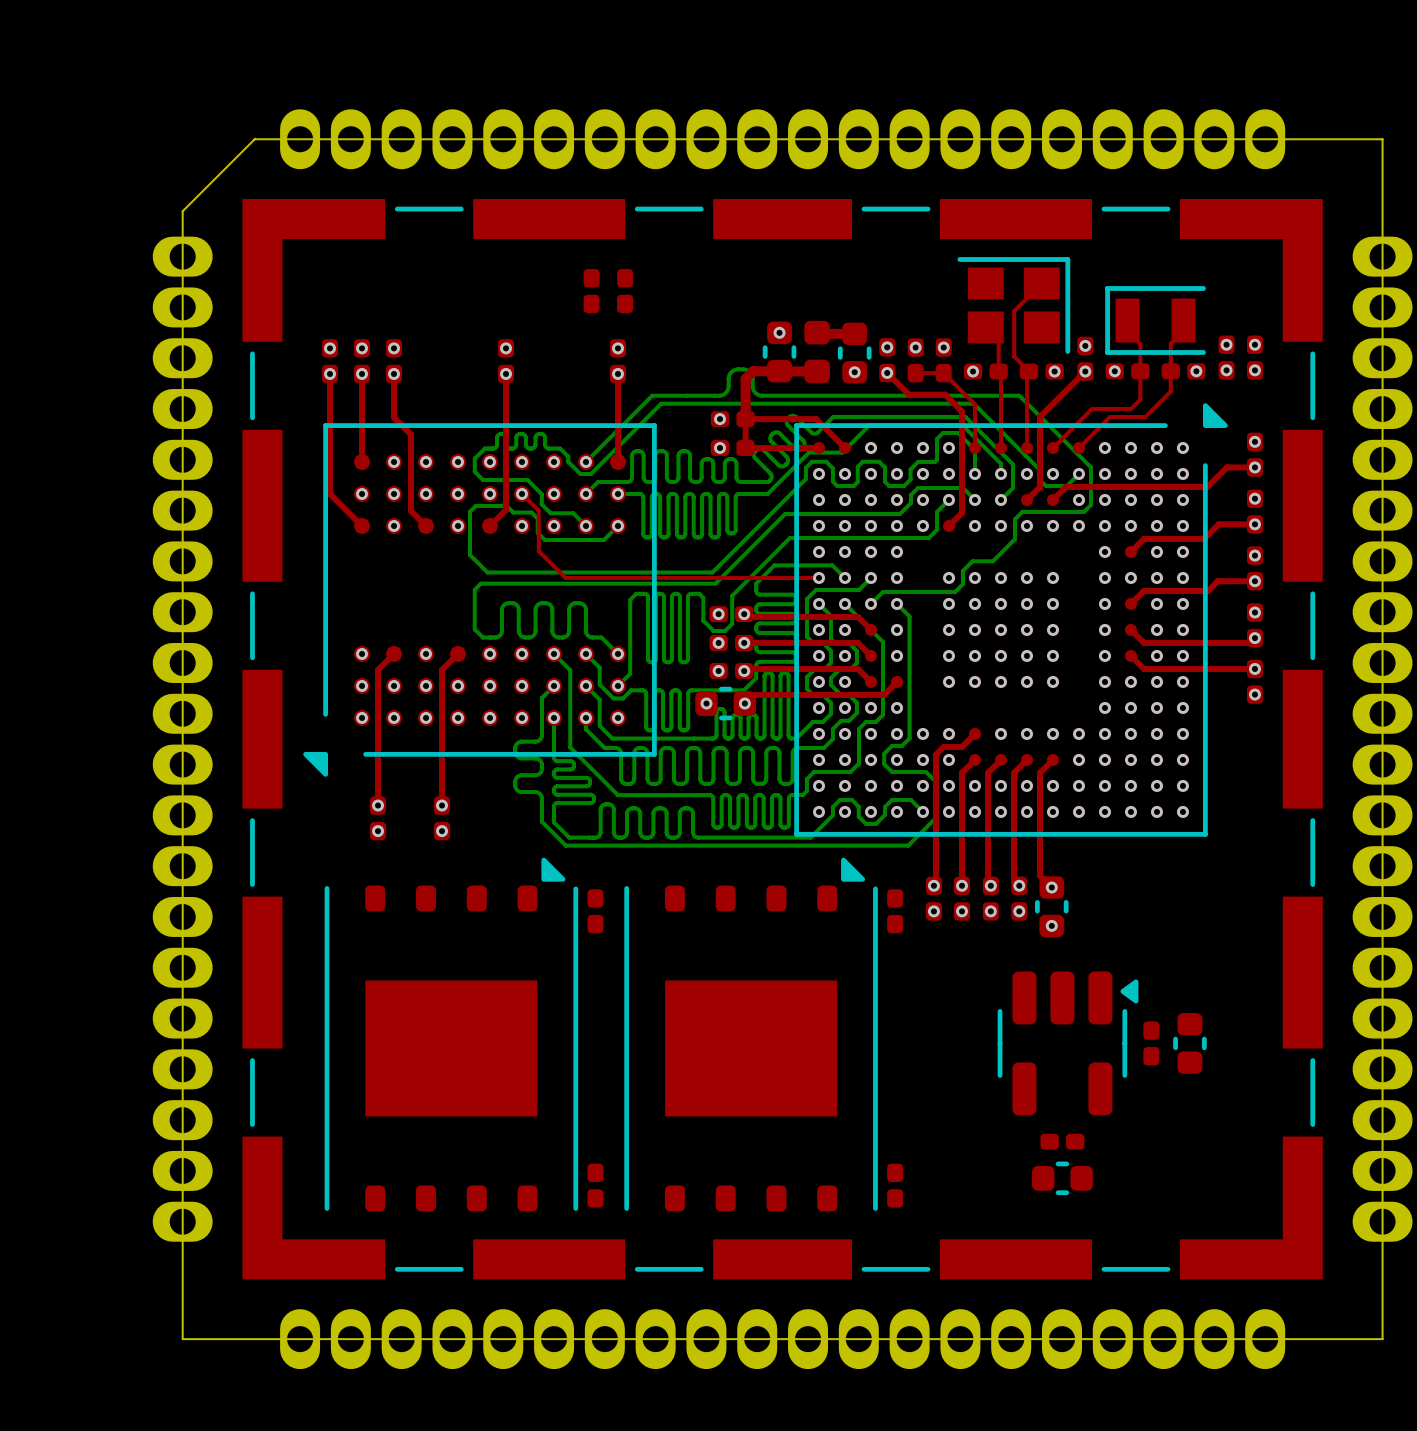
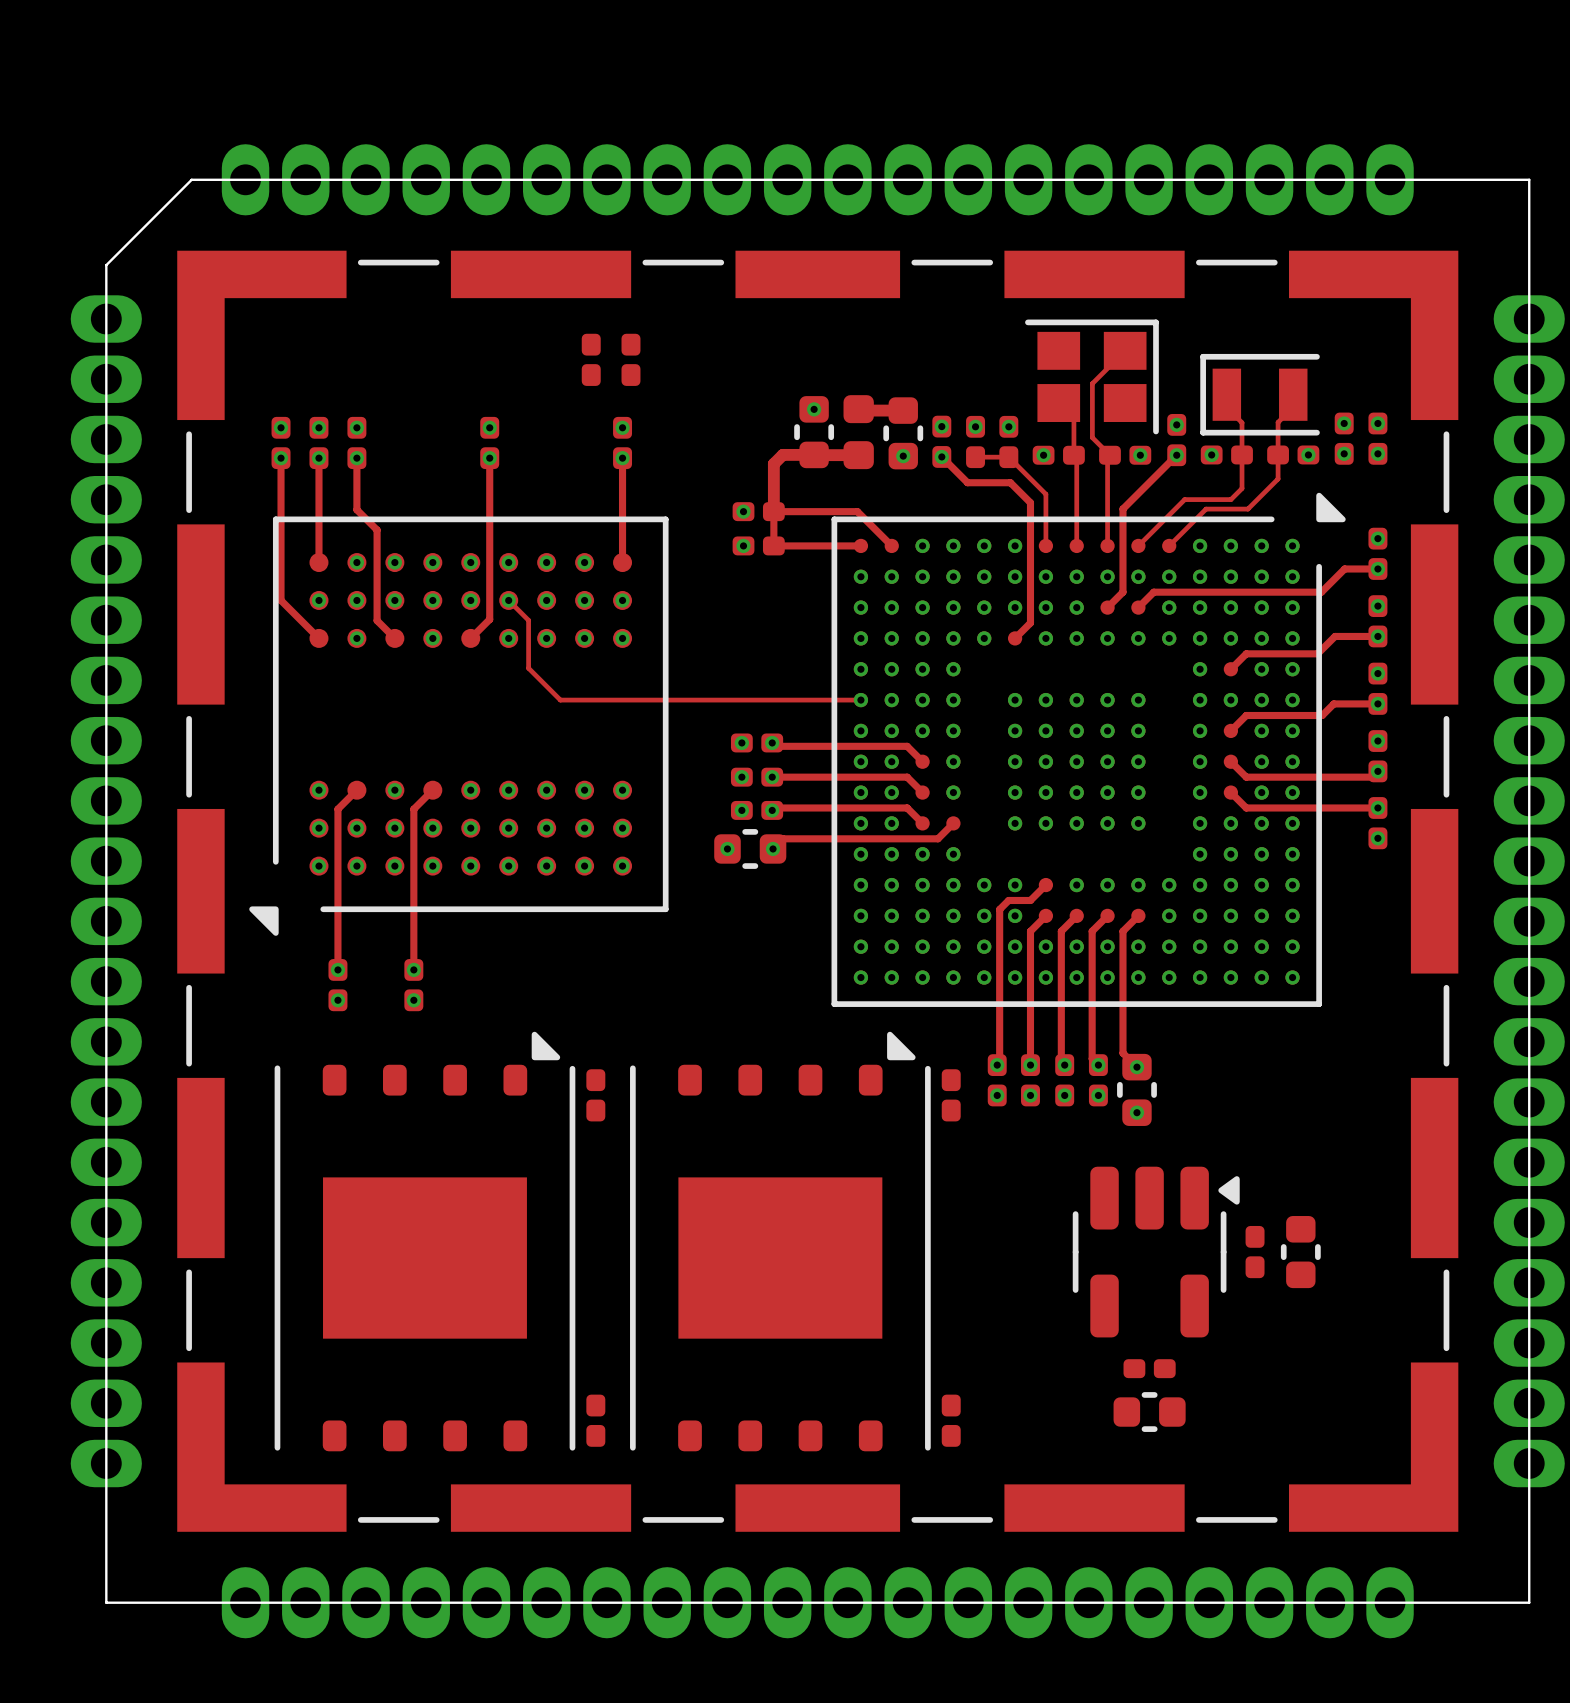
bottom track: (585, 461) (652, 395) (722, 395) (728, 389) (730, 372) (735, 369) (743, 369) (751, 373) (753, 390) (761, 395) (1019, 395) (1090, 467) (1090, 504) (1083, 511) (1022, 511) (1014, 519) (1014, 539) (992, 561) (972, 561) (963, 570) (963, 584) (955, 591) (883, 591) (871, 603) -> none
bottom track: (975, 473) (975, 449) (957, 432) (943, 432) (937, 439) (937, 459) (934, 461) (918, 461) (910, 469) (910, 479) (904, 485) (889, 485) (885, 481) (885, 467) (879, 461) (862, 461) (857, 466) (857, 482) (853, 485) (837, 485) (833, 481) (833, 468) (826, 461) (812, 461) (805, 467) (805, 479) (712, 572) (487, 572) (470, 554) (470, 511) (475, 505) (506, 505) (513, 512) (531, 512) (537, 518) (537, 532) (544, 539) (604, 539) (617, 525) -> none
bottom track: (1000, 473) (1000, 463) (962, 424) (869, 424) (842, 452) (808, 452) (767, 493) (736, 494) (735, 530) (733, 533) (727, 530) (727, 496) (725, 494) (718, 496) (718, 534) (715, 537) (710, 534) (708, 494) (704, 494) (702, 496) (702, 534) (698, 537) (693, 534) (693, 495) (688, 494) (685, 496) (685, 534) (680, 537) (676, 534) (676, 496) (674, 494) (669, 494) (668, 534) (663, 537) (660, 534) (660, 496) (657, 494) (653, 494) (651, 497) (651, 534) (646, 537) (643, 534) (642, 495) (617, 493) -> none
bottom track: (1078, 473) (1066, 485) (1045, 485) (1038, 479) (1038, 469) (973, 403) (661, 403) (590, 473) (580, 473) (568, 461) (568, 456) (560, 448) (546, 447) (544, 436) (541, 434) (536, 435) (535, 446) (531, 448) (526, 446) (525, 436) (523, 434) (517, 435) (515, 446) (510, 448) (506, 446) (505, 435) (499, 434) (497, 436) (495, 447) (484, 448) (474, 458) (474, 471) (483, 480) (527, 480) (541, 494) (541, 504) (550, 513) (573, 513) (585, 525) -> none
bottom track: (585, 493) (597, 481) (630, 481) (632, 477) (632, 455) (636, 451) (643, 454) (643, 477) (647, 481) (652, 481) (654, 479) (655, 455) (659, 451) (664, 451) (666, 454) (667, 479) (670, 481) (676, 481) (678, 477) (678, 454) (680, 451) (685, 451) (689, 454) (690, 477) (692, 481) (701, 479) (701, 462) (706, 459) (712, 462) (714, 480) (722, 481) (724, 477) (725, 462) (731, 459) (736, 462) (736, 477) (738, 481) (768, 481) (771, 474) (754, 457) (754, 453) (757, 449) (761, 448) (779, 465) (785, 465) (787, 461) (787, 457) (771, 441) (770, 437) (773, 433) (777, 432) (795, 449) (799, 449) (803, 447) (803, 441) (786, 423) (787, 419) (791, 415) (795, 416) (814, 433) (833, 416) (965, 416) (1012, 464) (1012, 487) (1000, 499) -> none
bottom track: (949, 499) (937, 511) (937, 529) (928, 537) (790, 537) (732, 595) (732, 623) (725, 630) (713, 630) (703, 620) (703, 597) (699, 593) (689, 594) (687, 659) (685, 662) (681, 661) (679, 659) (679, 595) (674, 593) (671, 596) (671, 659) (668, 662) (663, 659) (663, 596) (661, 593) (656, 595) (655, 659) (651, 662) (647, 659) (647, 596) (645, 593) (636, 593) (630, 599) (630, 673) (617, 685) -> none
bottom track: (975, 499) (963, 487) (918, 487) (911, 495) (911, 502) (900, 513) (785, 513) (715, 583) (480, 583) (474, 589) (474, 629) (482, 637) (495, 637) (500, 634) (502, 608) (508, 603) (514, 603) (518, 607) (518, 631) (521, 636) (529, 637) (534, 634) (535, 607) (539, 603) (545, 603) (552, 608) (553, 634) (557, 637) (564, 637) (568, 632) (569, 606) (573, 603) (579, 603) (585, 608) (587, 634) (591, 637) (601, 637) (617, 653) -> none
bottom track: (845, 577) (832, 565) (774, 565) (756, 583) (756, 592) (760, 594) (792, 594) (795, 596) (795, 601) (792, 604) (759, 604) (756, 606) (756, 611) (759, 613) (792, 613) (795, 616) (795, 620) (792, 623) (759, 623) (756, 625) (756, 630) (759, 632) (792, 633) (795, 635) (795, 639) (792, 642) (759, 642) (756, 644) (756, 649) (759, 652) (792, 652) (795, 655) (795, 659) (791, 661) (758, 662) (756, 665) (756, 678) (743, 690) (689, 690) (688, 727) (685, 730) (679, 727) (678, 691) (673, 690) (671, 692) (671, 727) (668, 730) (663, 727) (662, 692) (660, 690) (655, 691) (654, 727) (648, 730) (646, 727) (645, 691) (631, 690) (623, 698) (613, 698) (599, 684) (599, 667) (585, 653) -> none
bottom track: (871, 577) (859, 589) (816, 589) (807, 599) (807, 636) (814, 643) (823, 643) (831, 651) (831, 662) (823, 669) (814, 669) (806, 677) (806, 688) (814, 695) (823, 695) (831, 702) (831, 714) (823, 721) (812, 721) (796, 738) (790, 738) (788, 735) (788, 676) (786, 672) (780, 675) (780, 735) (777, 738) (772, 735) (772, 676) (770, 672) (764, 675) (764, 735) (761, 738) (756, 736) (756, 717) (753, 714) (748, 717) (747, 737) (740, 736) (740, 717) (735, 714) (732, 717) (732, 736) (726, 738) (724, 711) (719, 708) (716, 711) (716, 735) (714, 738) (612, 738) (599, 725) (599, 699) (585, 685) -> none
bottom track: (819, 603) (831, 615) (831, 639) (835, 643) (849, 643) (857, 651) (857, 662) (849, 669) (839, 669) (831, 678) (831, 684) (842, 695) (849, 695) (857, 702) (857, 712) (849, 720) (841, 720) (832, 729) (832, 739) (824, 747) (794, 749) (792, 779) (789, 783) (783, 783) (779, 780) (779, 752) (774, 747) (768, 748) (766, 751) (766, 779) (764, 782) (757, 783) (753, 781) (752, 751) (750, 748) (745, 747) (739, 752) (739, 780) (735, 783) (729, 783) (726, 779) (726, 751) (724, 748) (718, 747) (713, 752) (713, 780) (709, 783) (703, 783) (700, 779) (700, 751) (697, 748) (692, 747) (687, 752) (686, 780) (683, 783) (677, 783) (673, 779) (673, 751) (671, 748) (665, 747) (660, 752) (660, 780) (657, 783) (651, 783) (647, 779) (647, 751) (644, 748) (639, 747) (634, 752) (633, 780) (631, 783) (625, 783) (621, 779) (620, 750) (616, 748) (604, 747) (585, 729) (585, 717) -> none
bottom track: (845, 603) (883, 641) (883, 714) (875, 721) (866, 721) (859, 728) (859, 763) (850, 771) (814, 771) (806, 779) (806, 790) (802, 795) (789, 796) (788, 824) (786, 827) (780, 825) (780, 798) (777, 795) (772, 797) (772, 824) (768, 827) (763, 825) (762, 795) (757, 795) (755, 797) (755, 824) (751, 827) (746, 825) (746, 797) (744, 795) (739, 796) (738, 825) (733, 827) (730, 824) (729, 797) (723, 795) (721, 798) (721, 825) (716, 827) (713, 825) (713, 798) (711, 795) (617, 795) (570, 747) (570, 670) (553, 653) -> none
bottom track: (897, 603) (909, 616) (909, 738) (901, 745) (892, 745) (884, 753) (884, 764) (892, 771) (925, 771) (935, 780) (935, 818) (908, 845) (565, 845) (542, 821) (540, 794) (536, 792) (519, 791) (515, 786) (515, 779) (518, 776) (536, 775) (541, 770) (541, 763) (539, 759) (518, 757) (515, 753) (515, 747) (519, 742) (536, 741) (540, 738) (542, 697) (553, 685) -> none
bottom track: (553, 717) (554, 759) (556, 761) (571, 761) (573, 764) (571, 769) (555, 770) (554, 776) (587, 777) (589, 781) (587, 786) (556, 786) (554, 792) (557, 794) (591, 794) (593, 797) (591, 803) (554, 804) (553, 822) (569, 837) (599, 836) (600, 808) (605, 804) (610, 804) (613, 807) (613, 833) (619, 837) (626, 834) (627, 812) (631, 808) (636, 808) (639, 811) (640, 833) (645, 837) (653, 834) (653, 812) (658, 808) (663, 808) (666, 811) (666, 833) (671, 837) (679, 834) (679, 812) (684, 808) (689, 808) (692, 811) (693, 833) (698, 837) (810, 837) (833, 815) (833, 806) (840, 799) (851, 799) (858, 806) (858, 816) (866, 823) (875, 823) (885, 814) (885, 806) (892, 799) (911, 799) (923, 811) -> none

